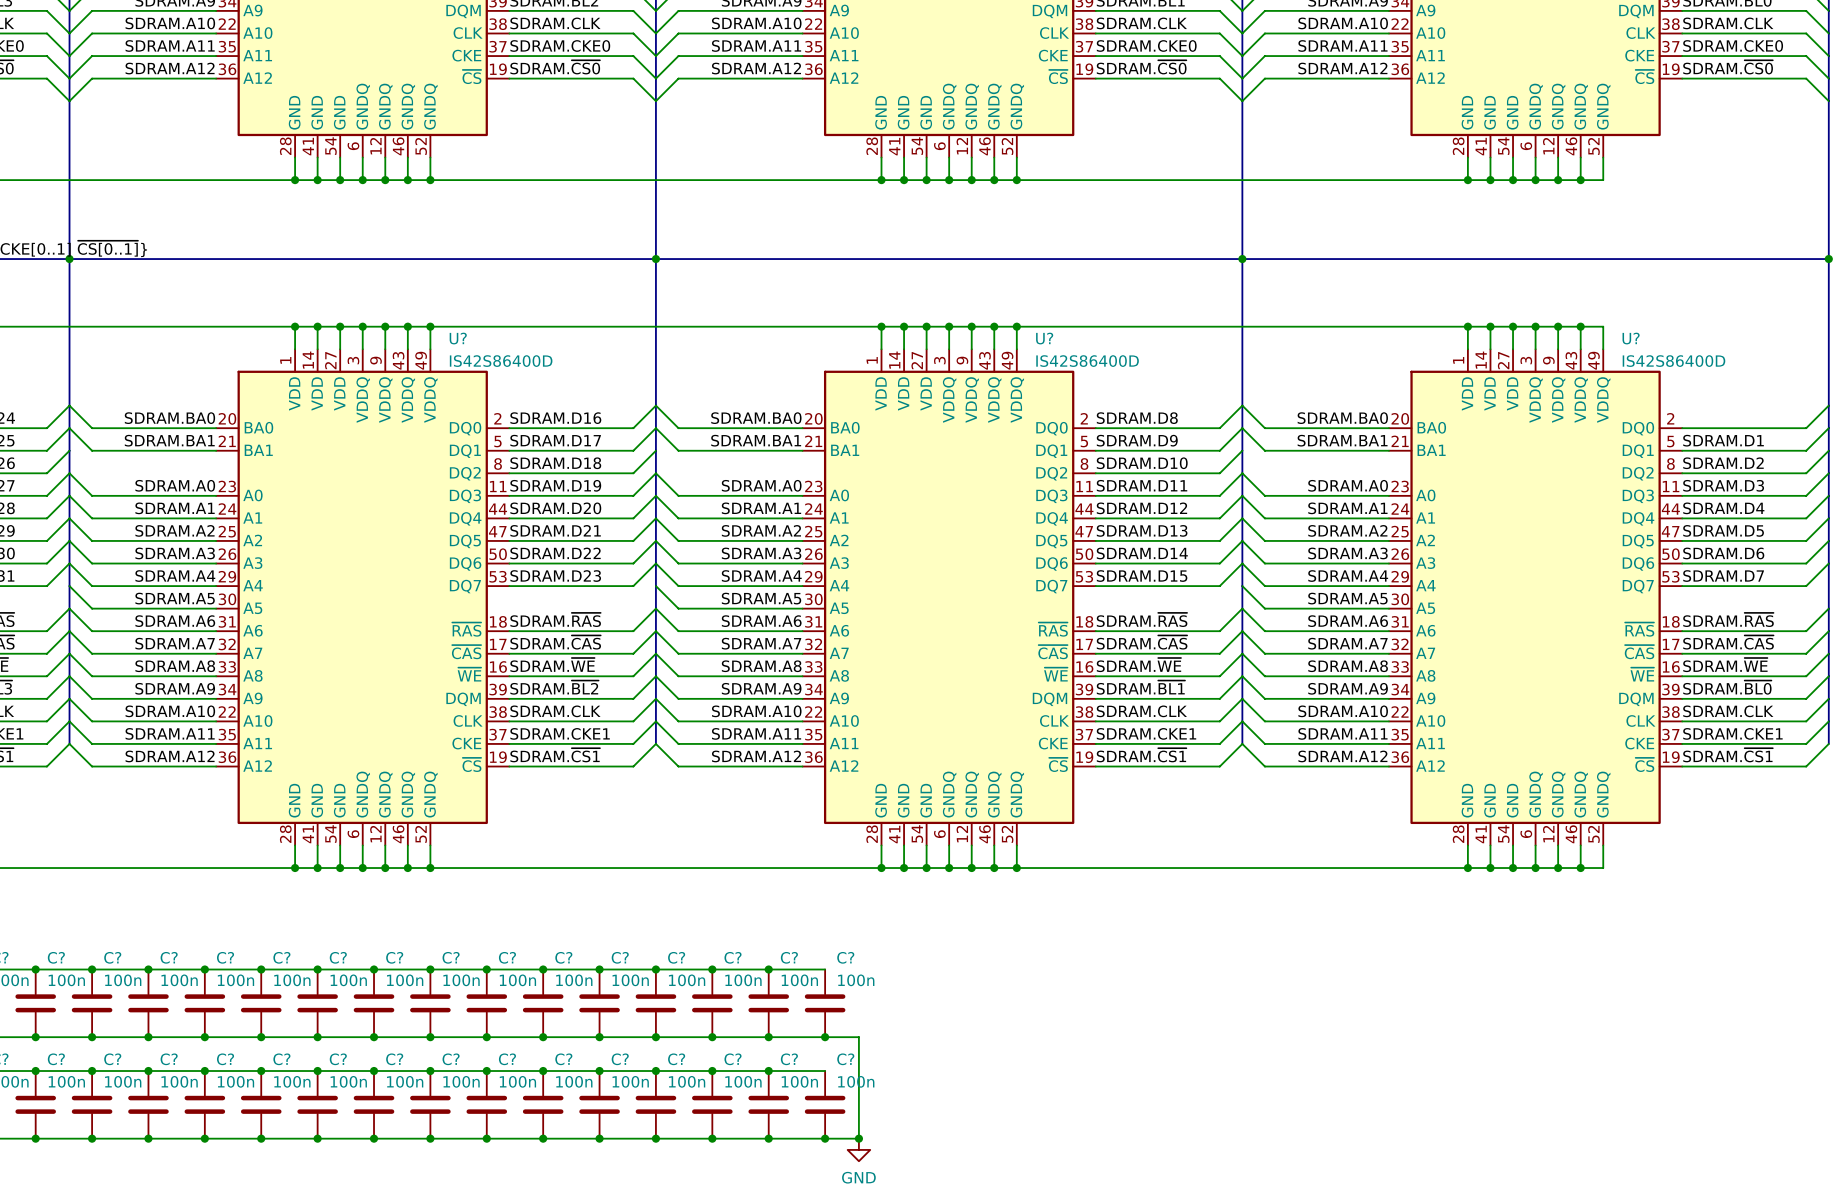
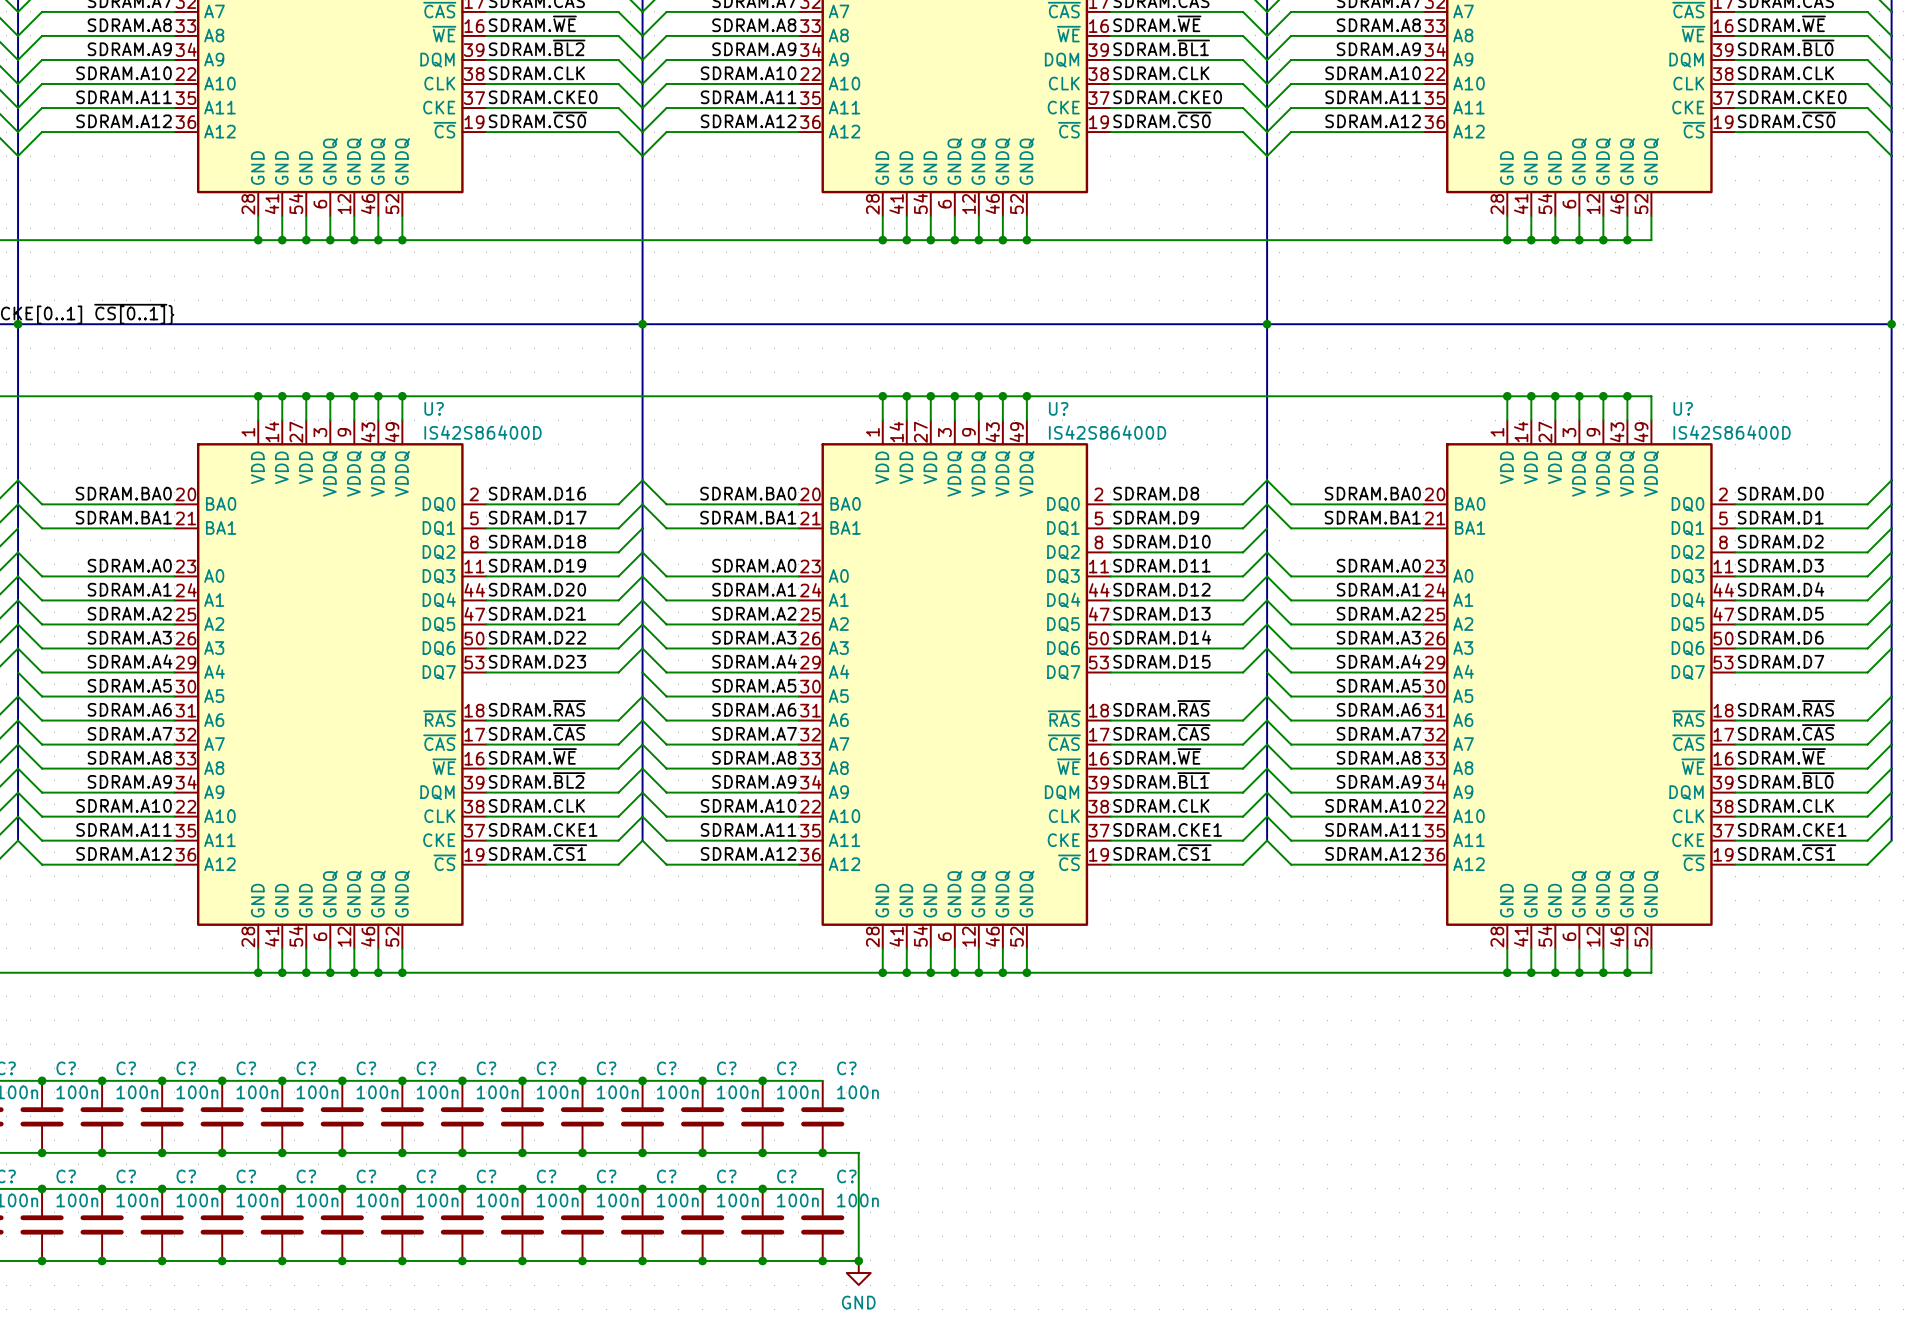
label: none -> SDRAM.D0 (1780, 493)

